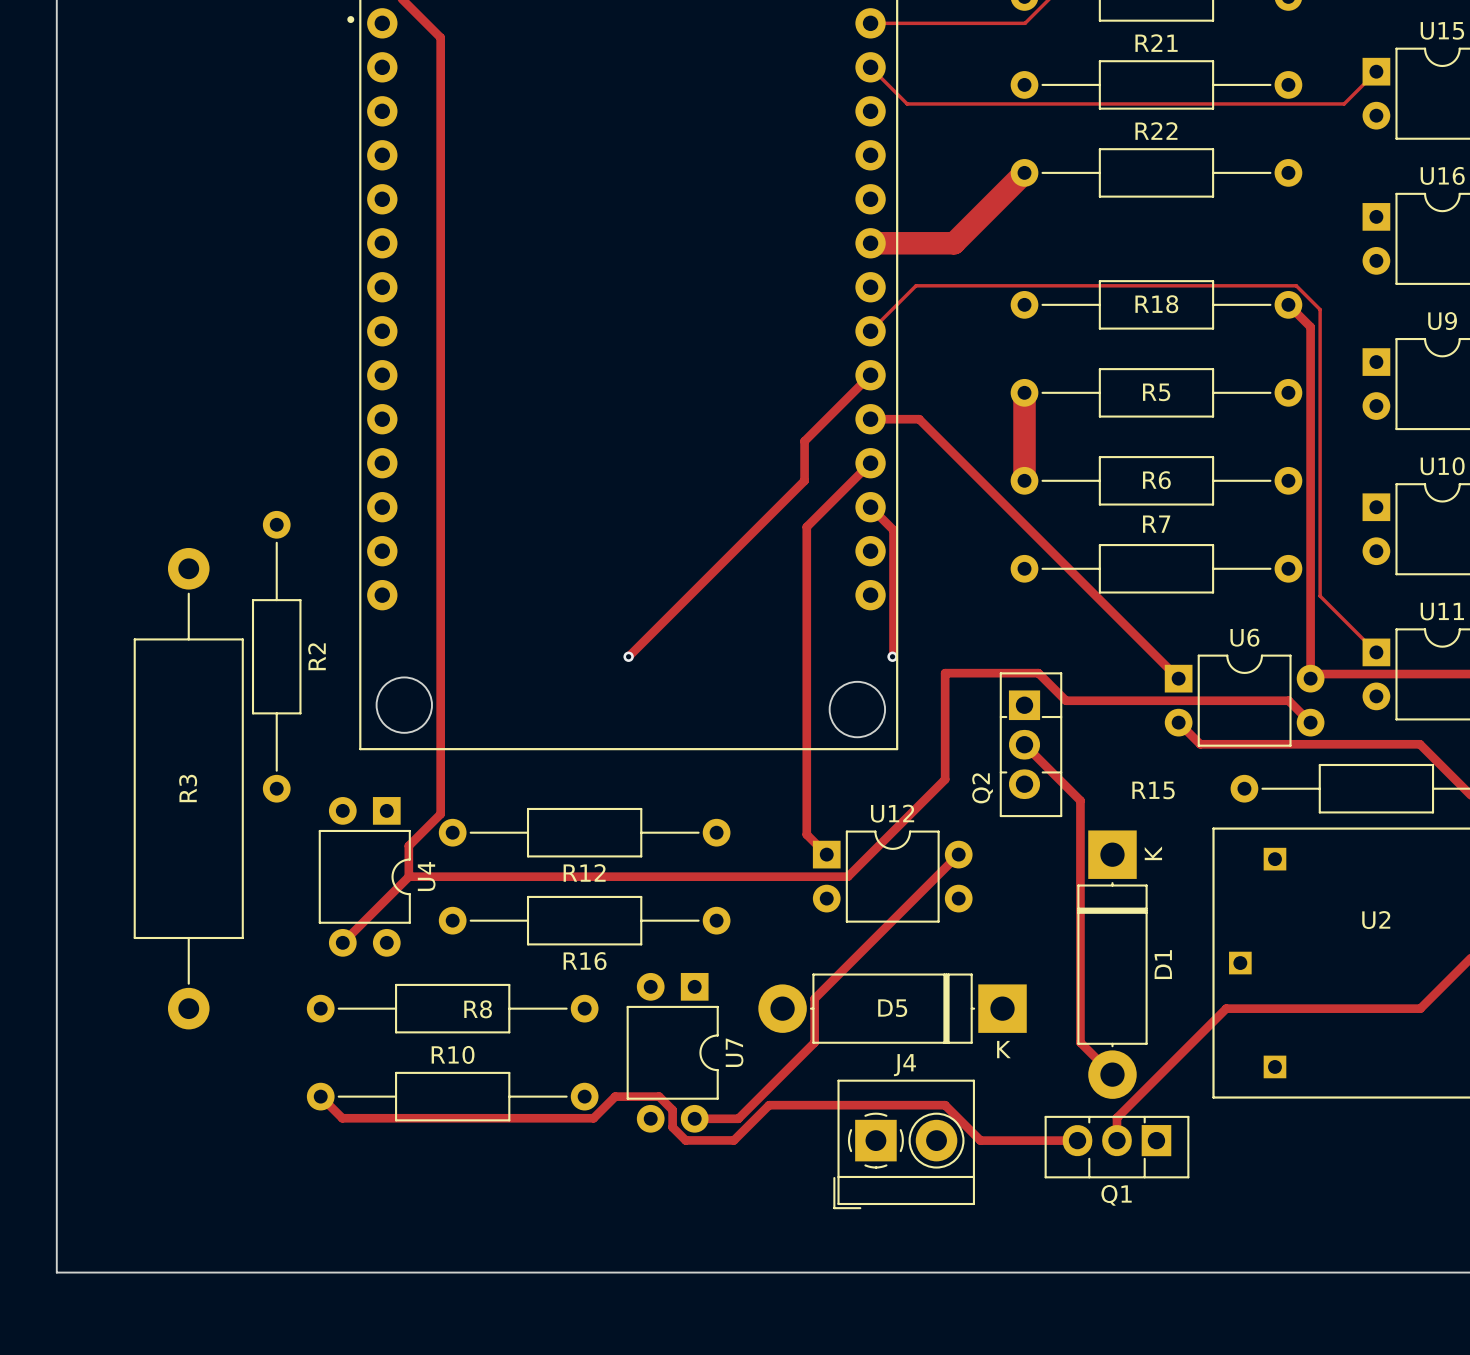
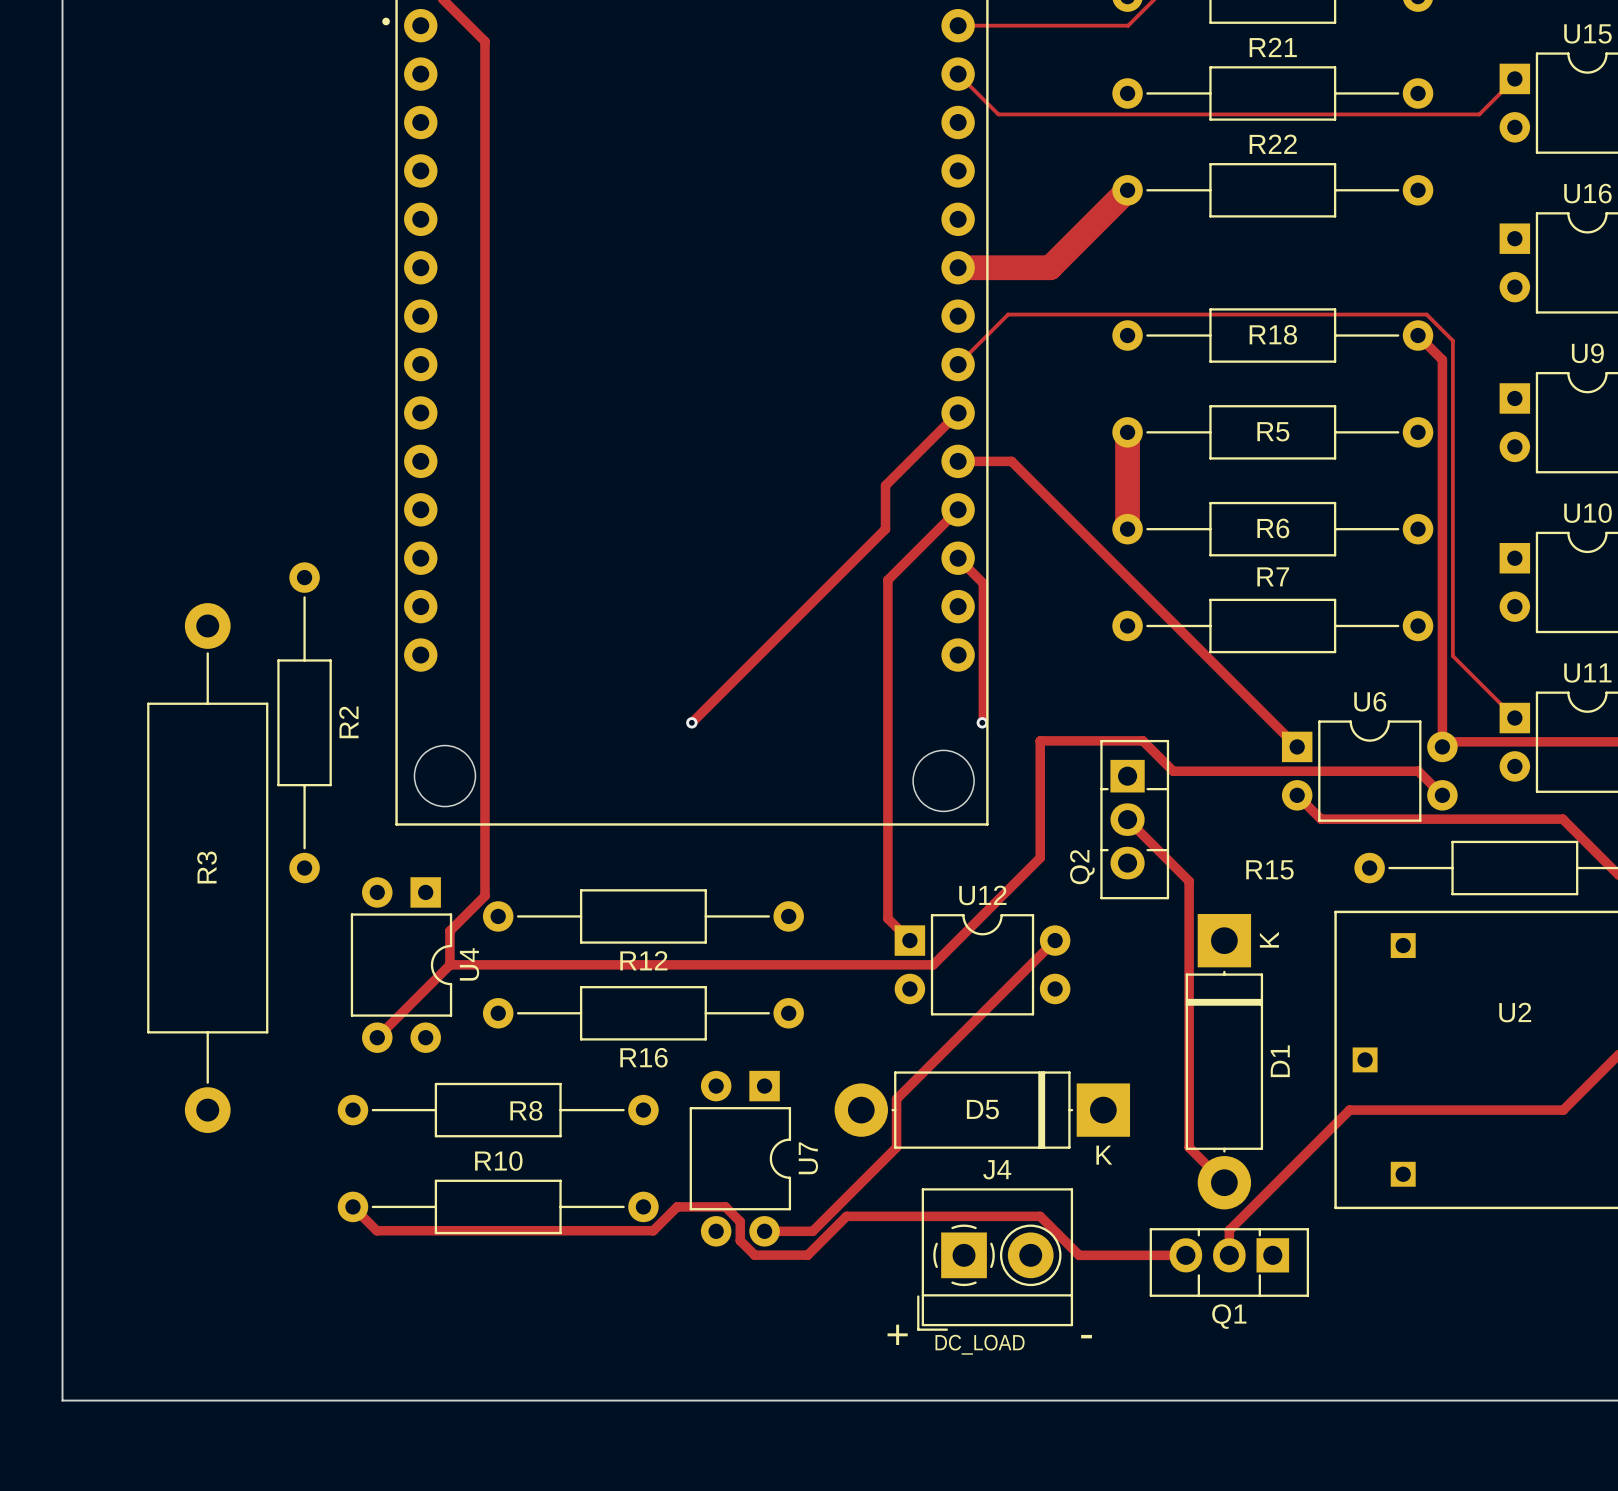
text: none -> + (897, 1334)
text: none -> - (1086, 1336)
text: none -> DC_LOAD (980, 1344)

